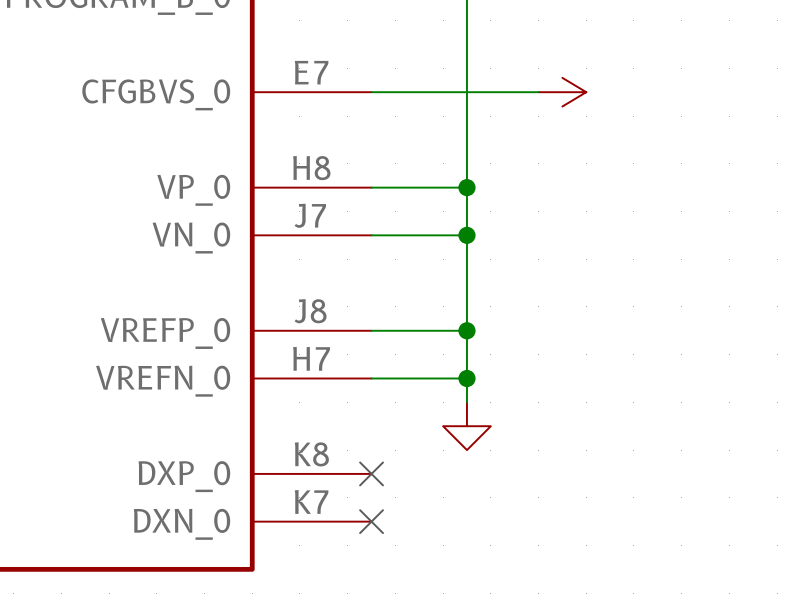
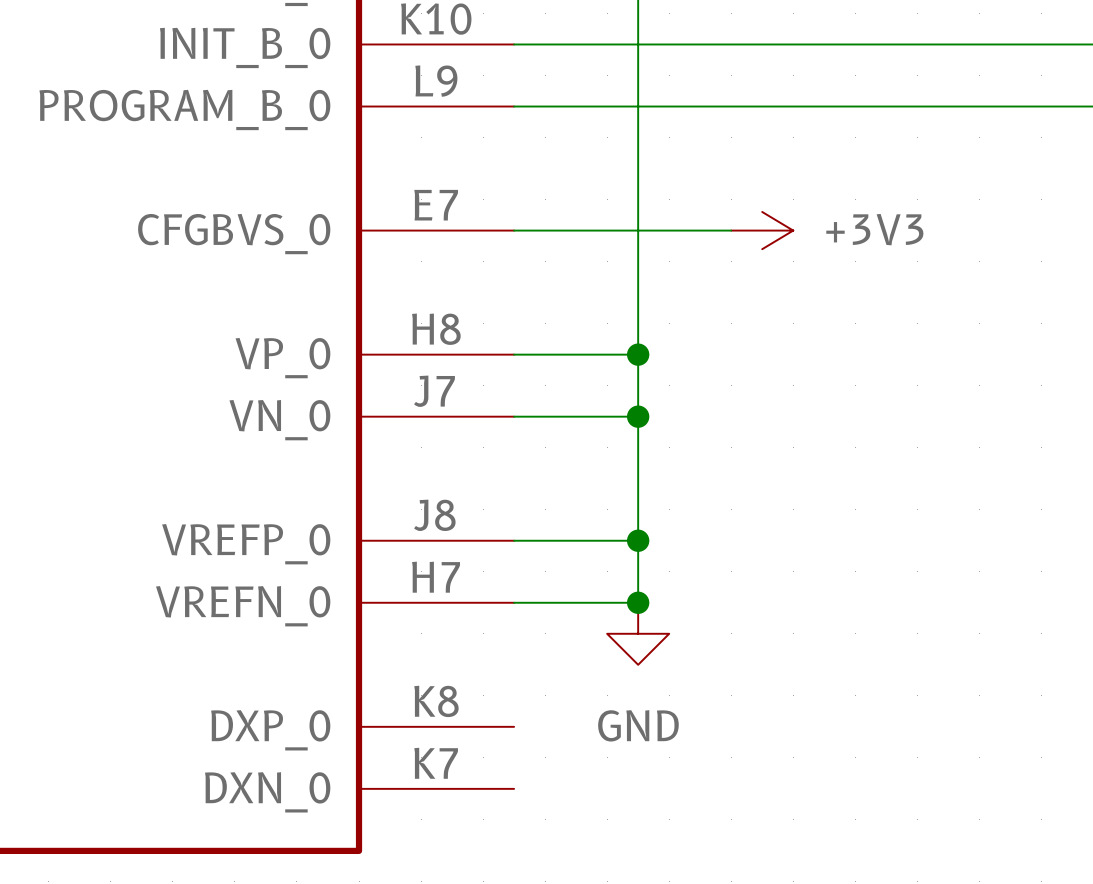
power symbol text: none -> +3V3 (874, 229)
power symbol: none -> GND (638, 633)
power symbol: (466, 426) -> none
no-connect mark: (371, 473) -> none
no-connect mark: (371, 521) -> none

